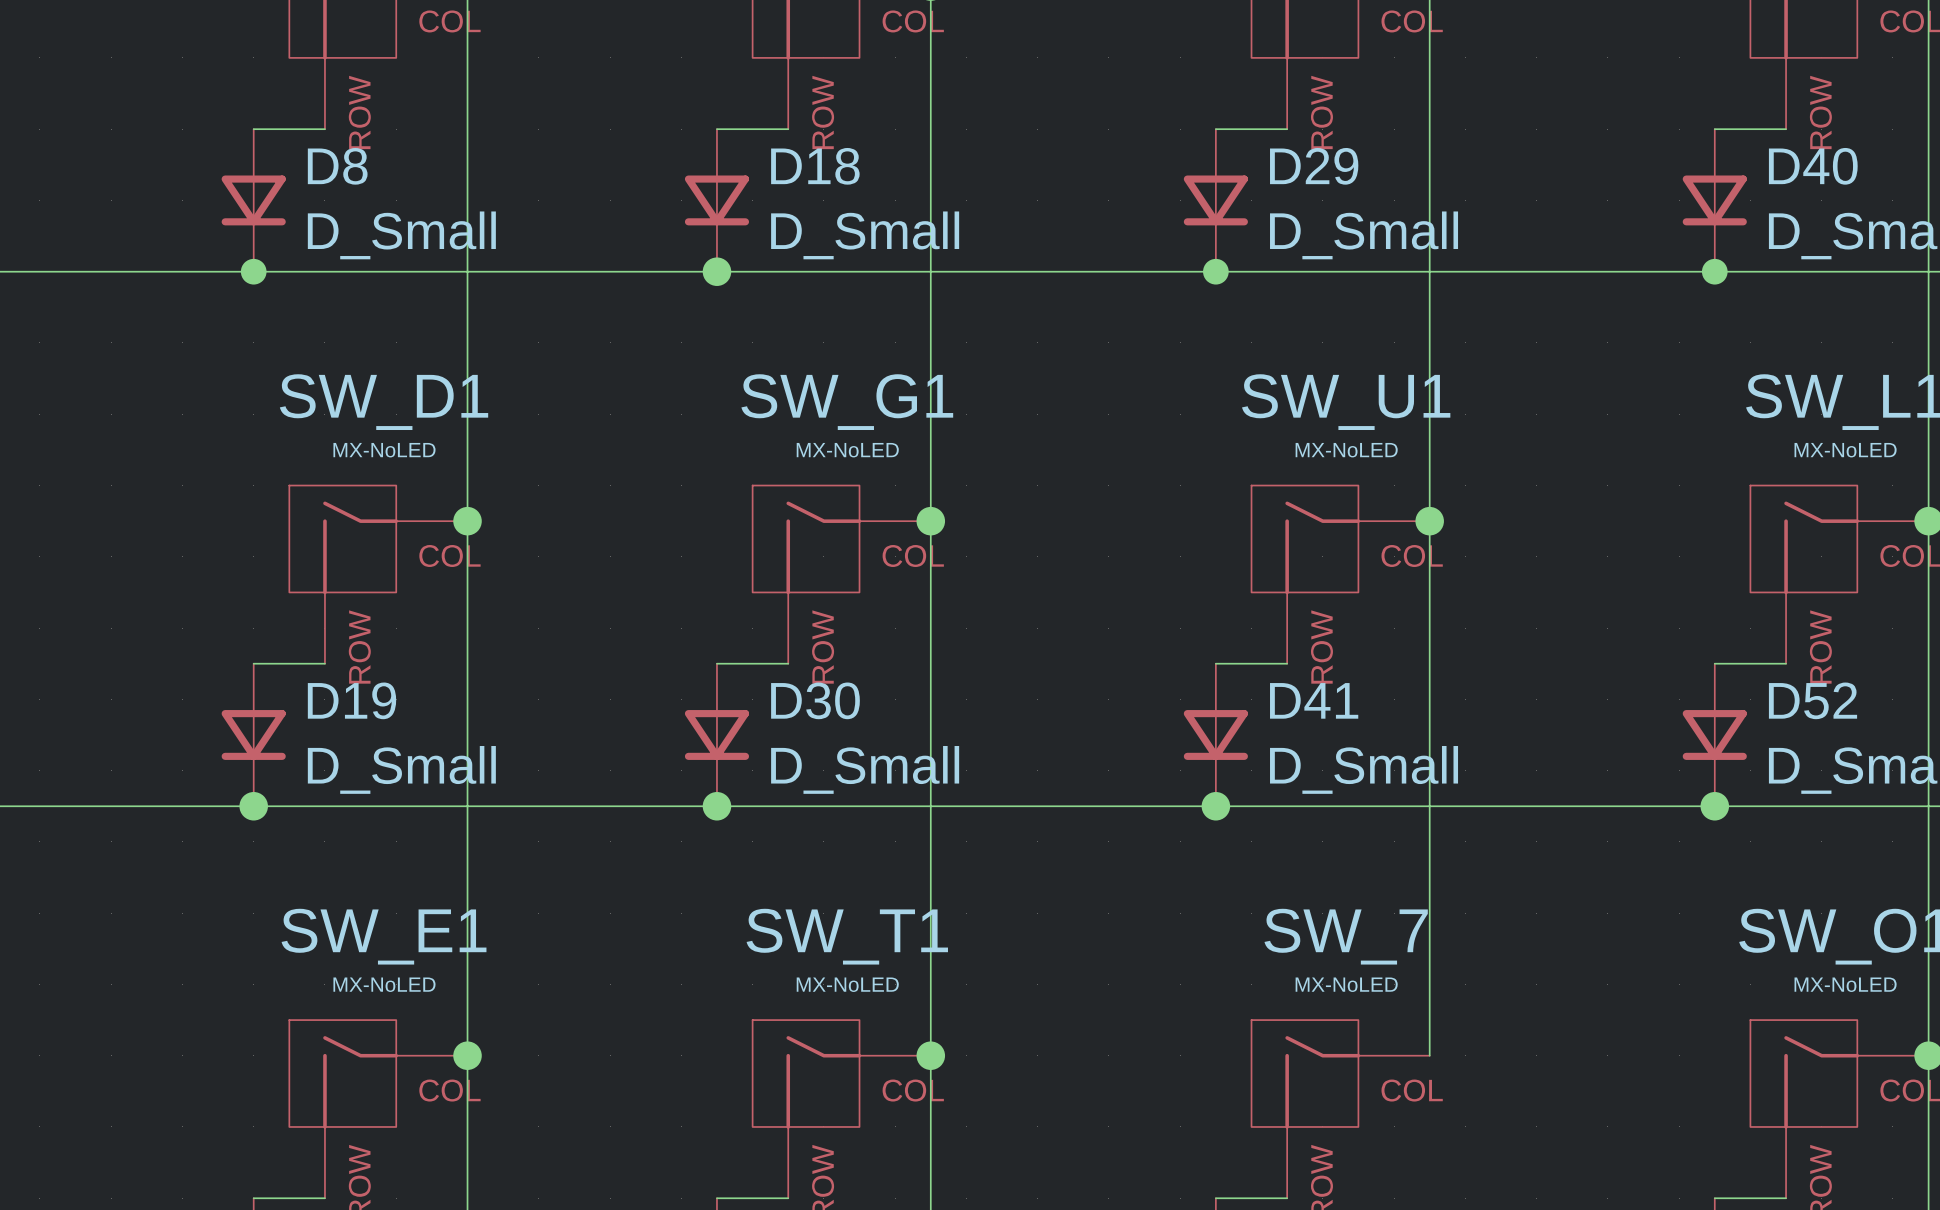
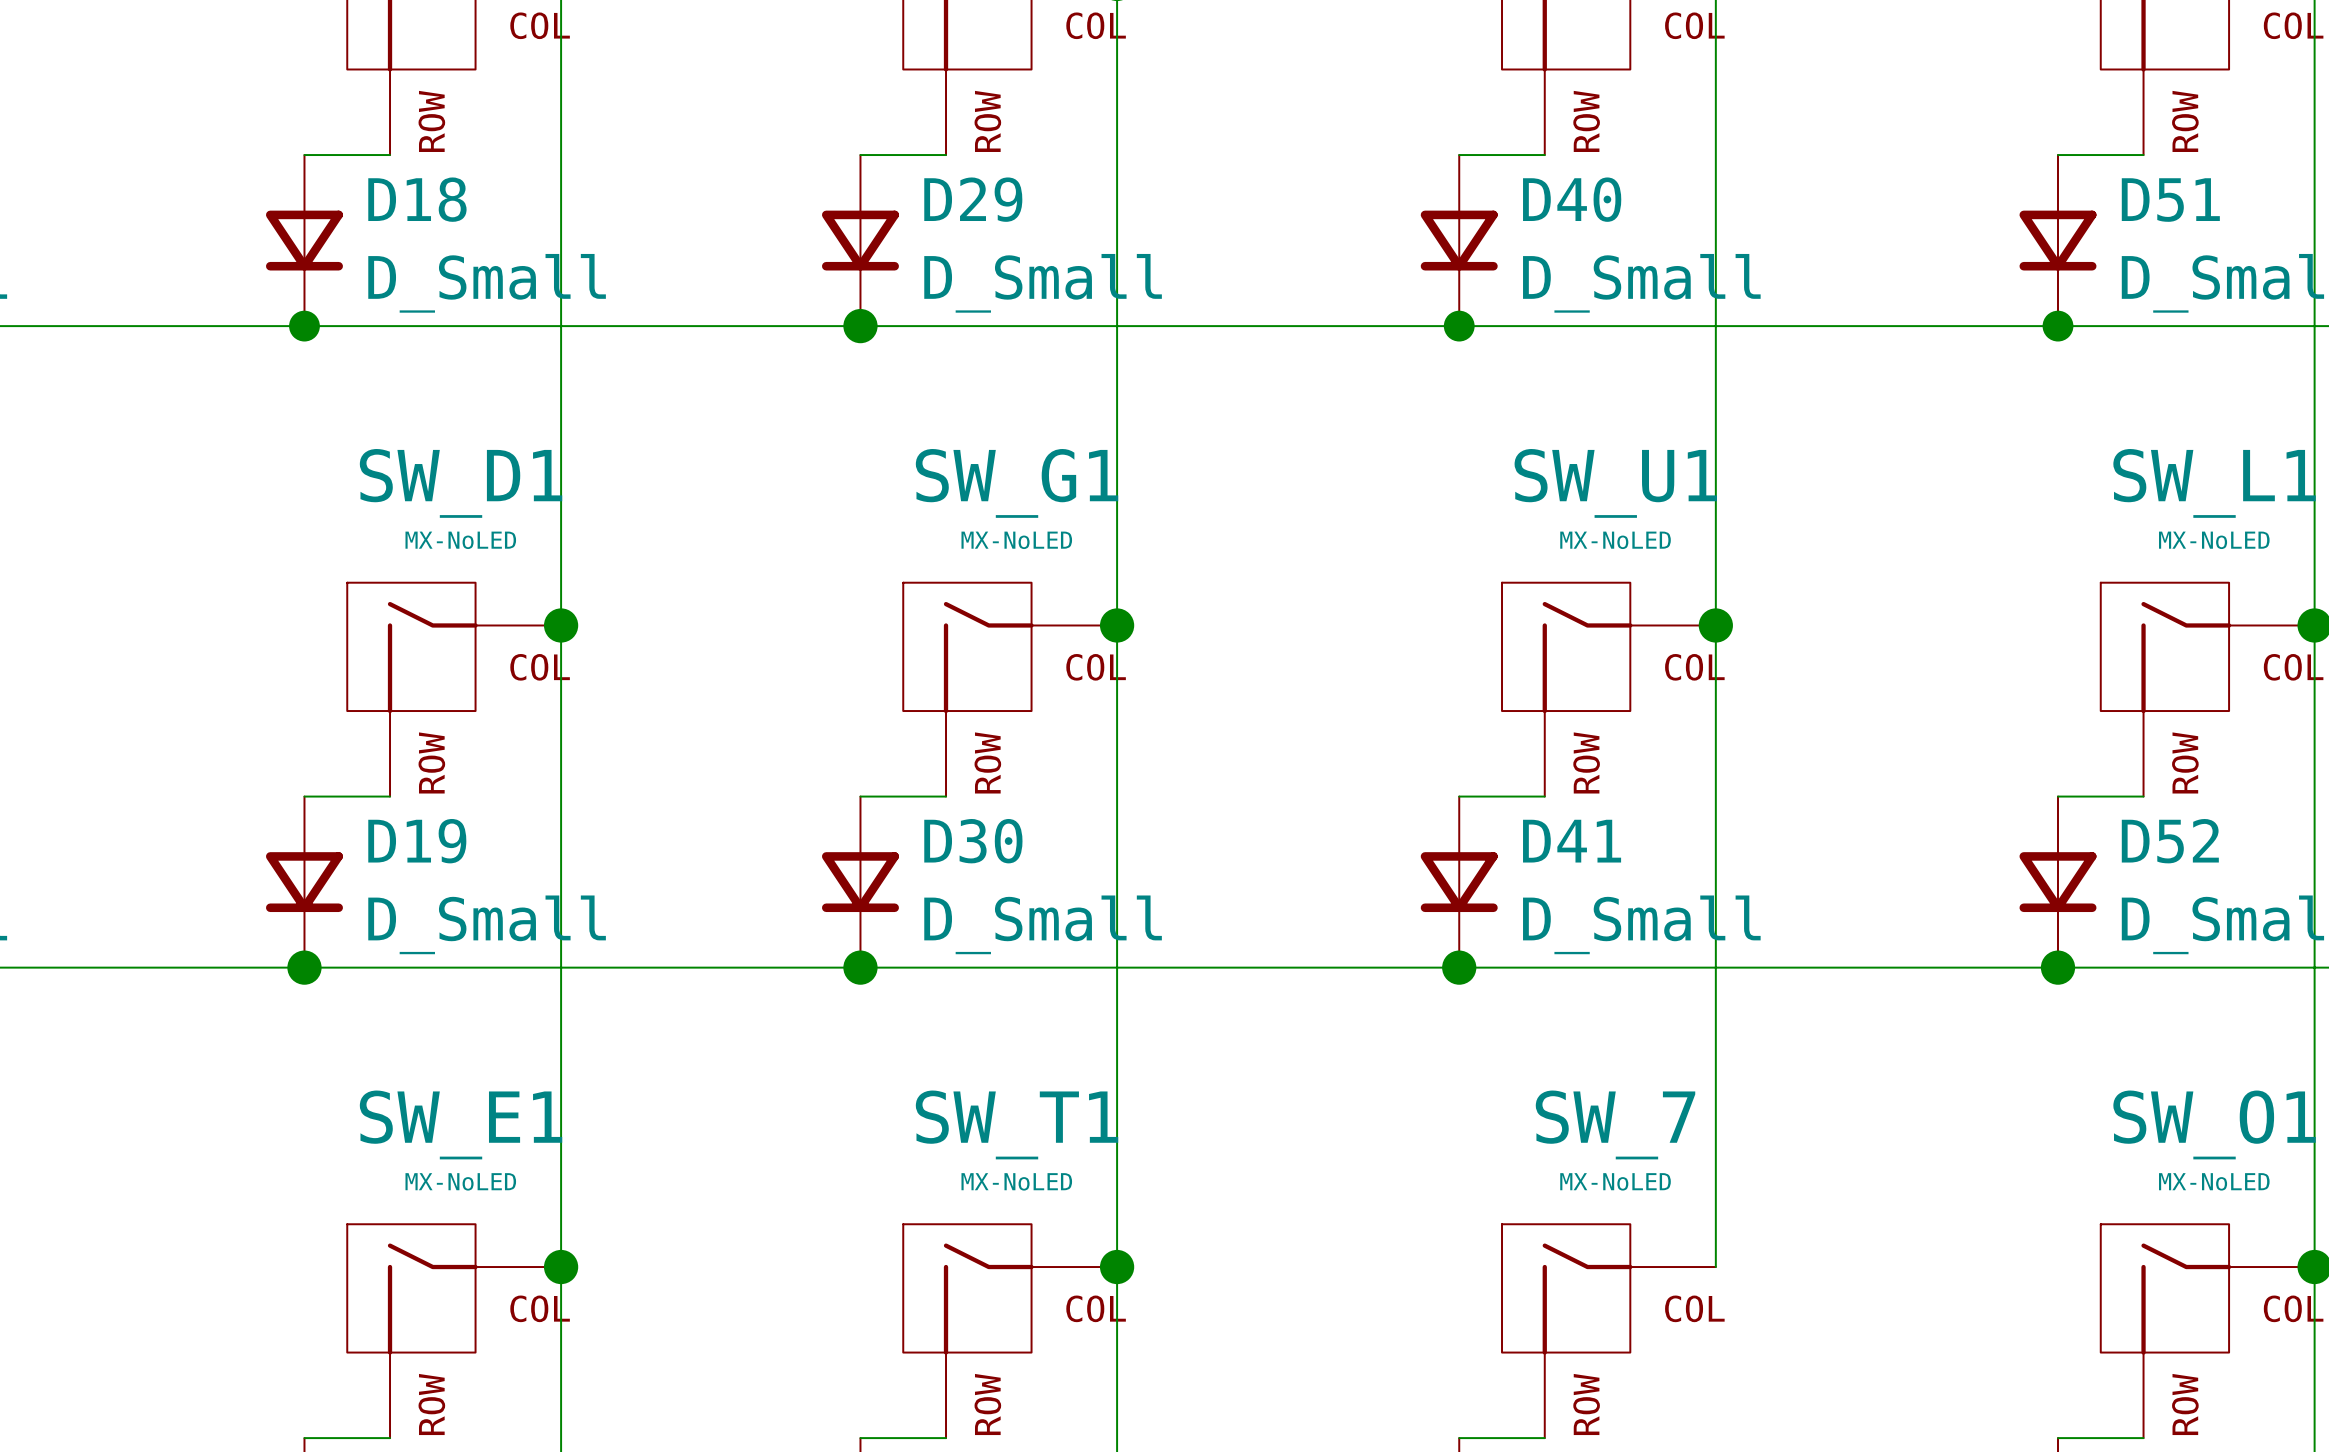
D8 name: D8 (337, 166) -> D18 (417, 199)
D18 name: D18 (815, 166) -> D29 (973, 199)
D29 name: D29 (1314, 166) -> D40 (1572, 199)
D40 name: D40 (1813, 166) -> D51 (2170, 200)

